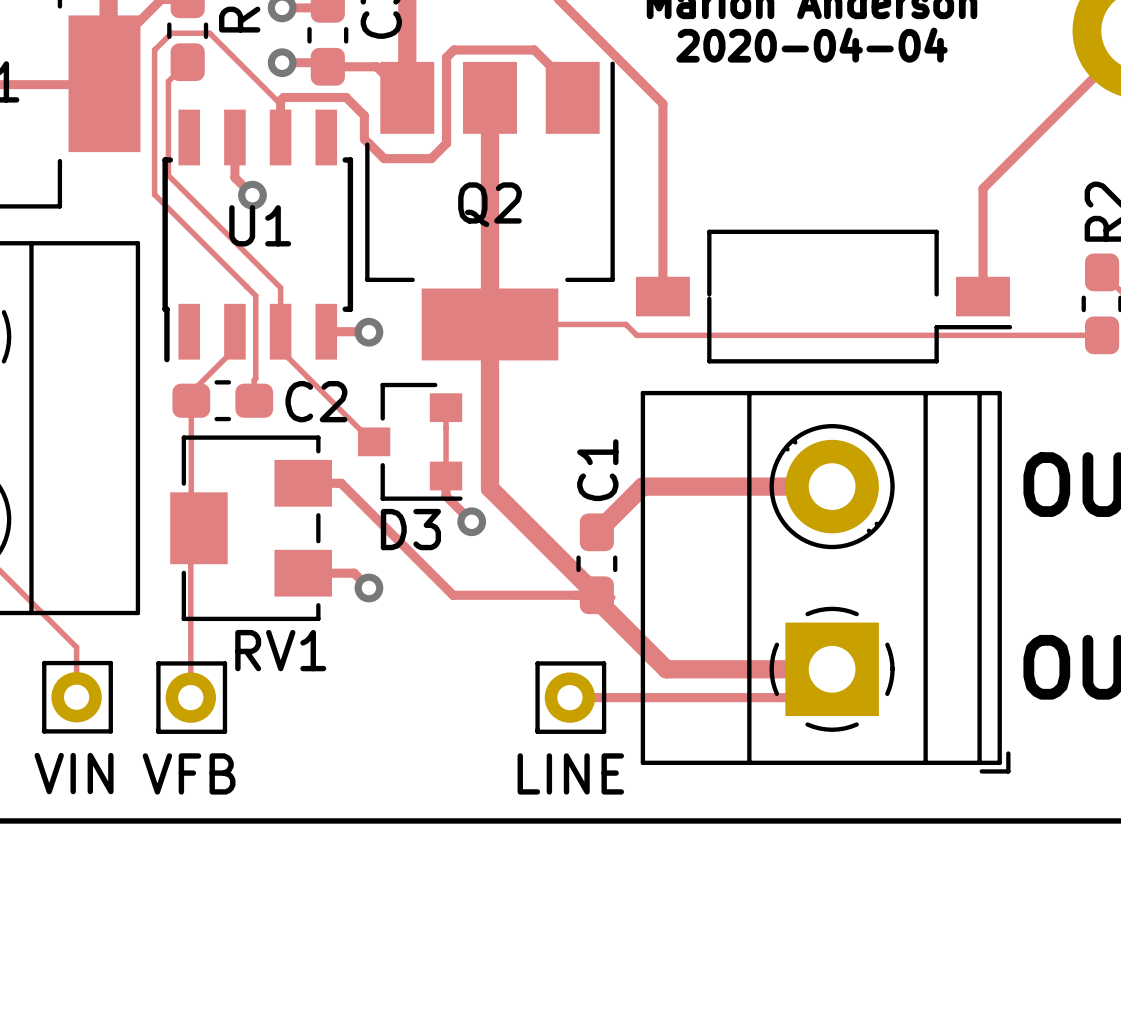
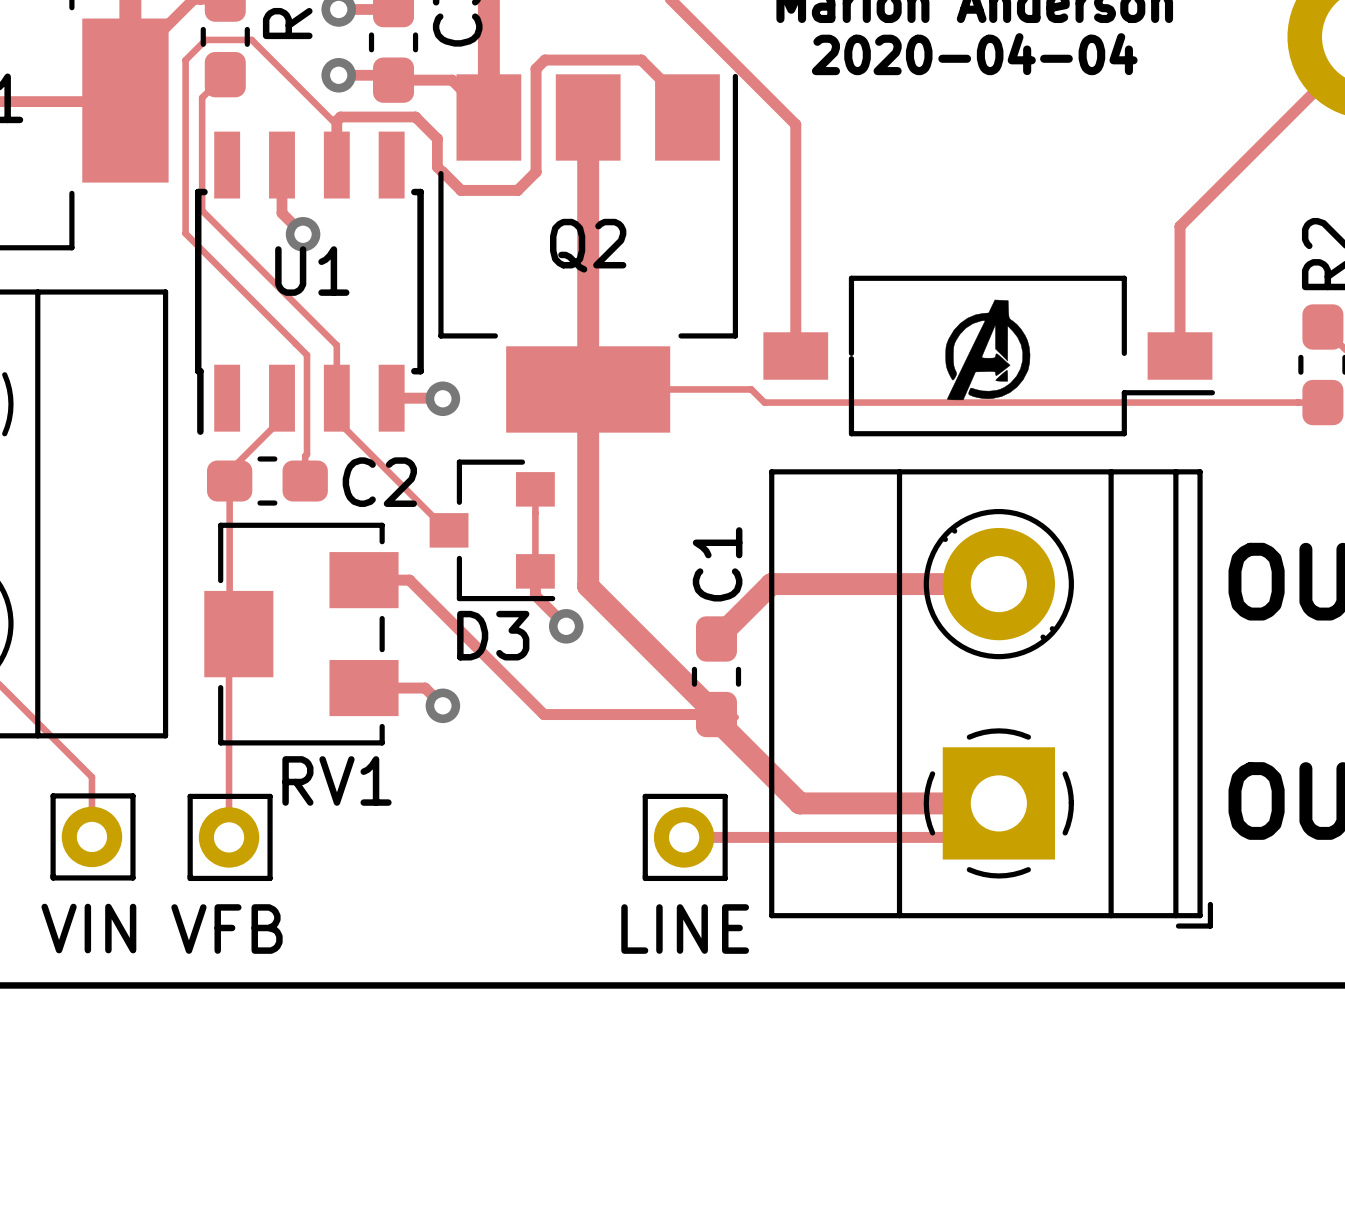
drawing: none -> [945, 299, 1031, 401]

